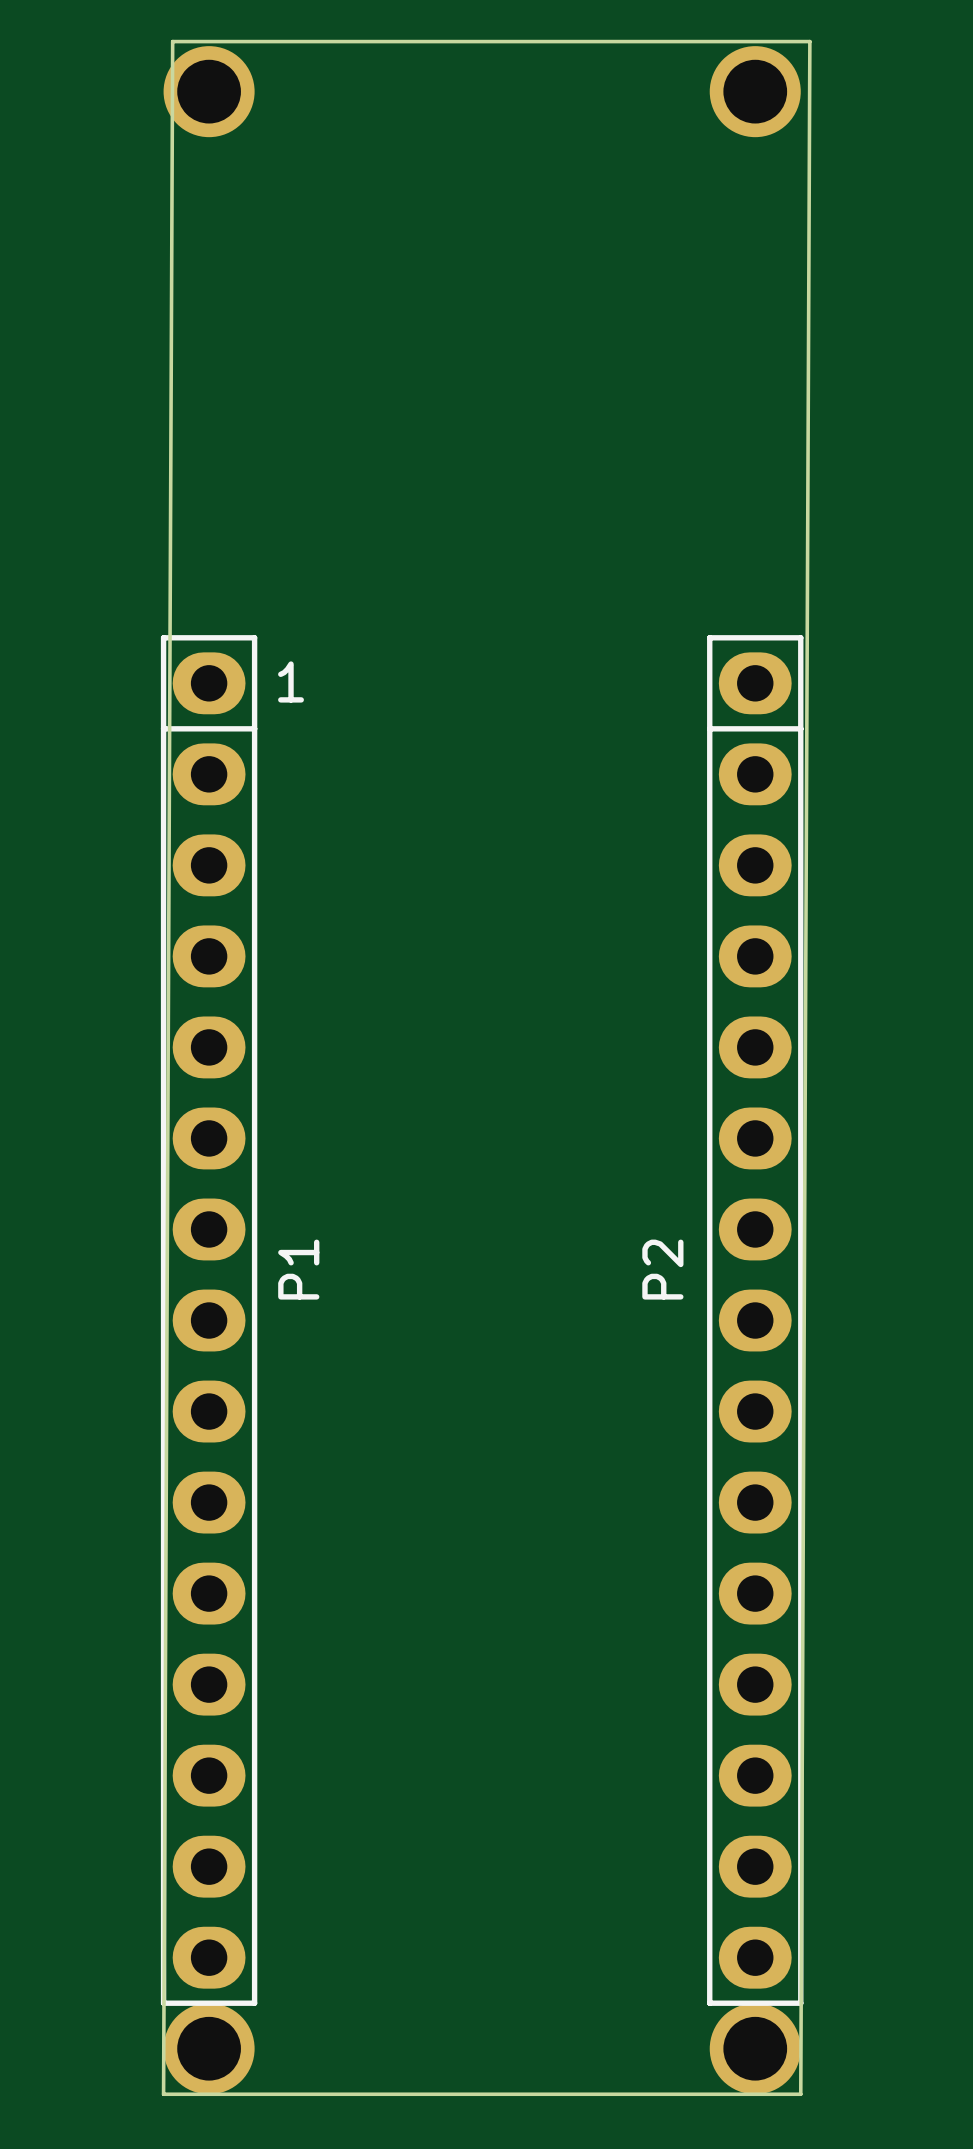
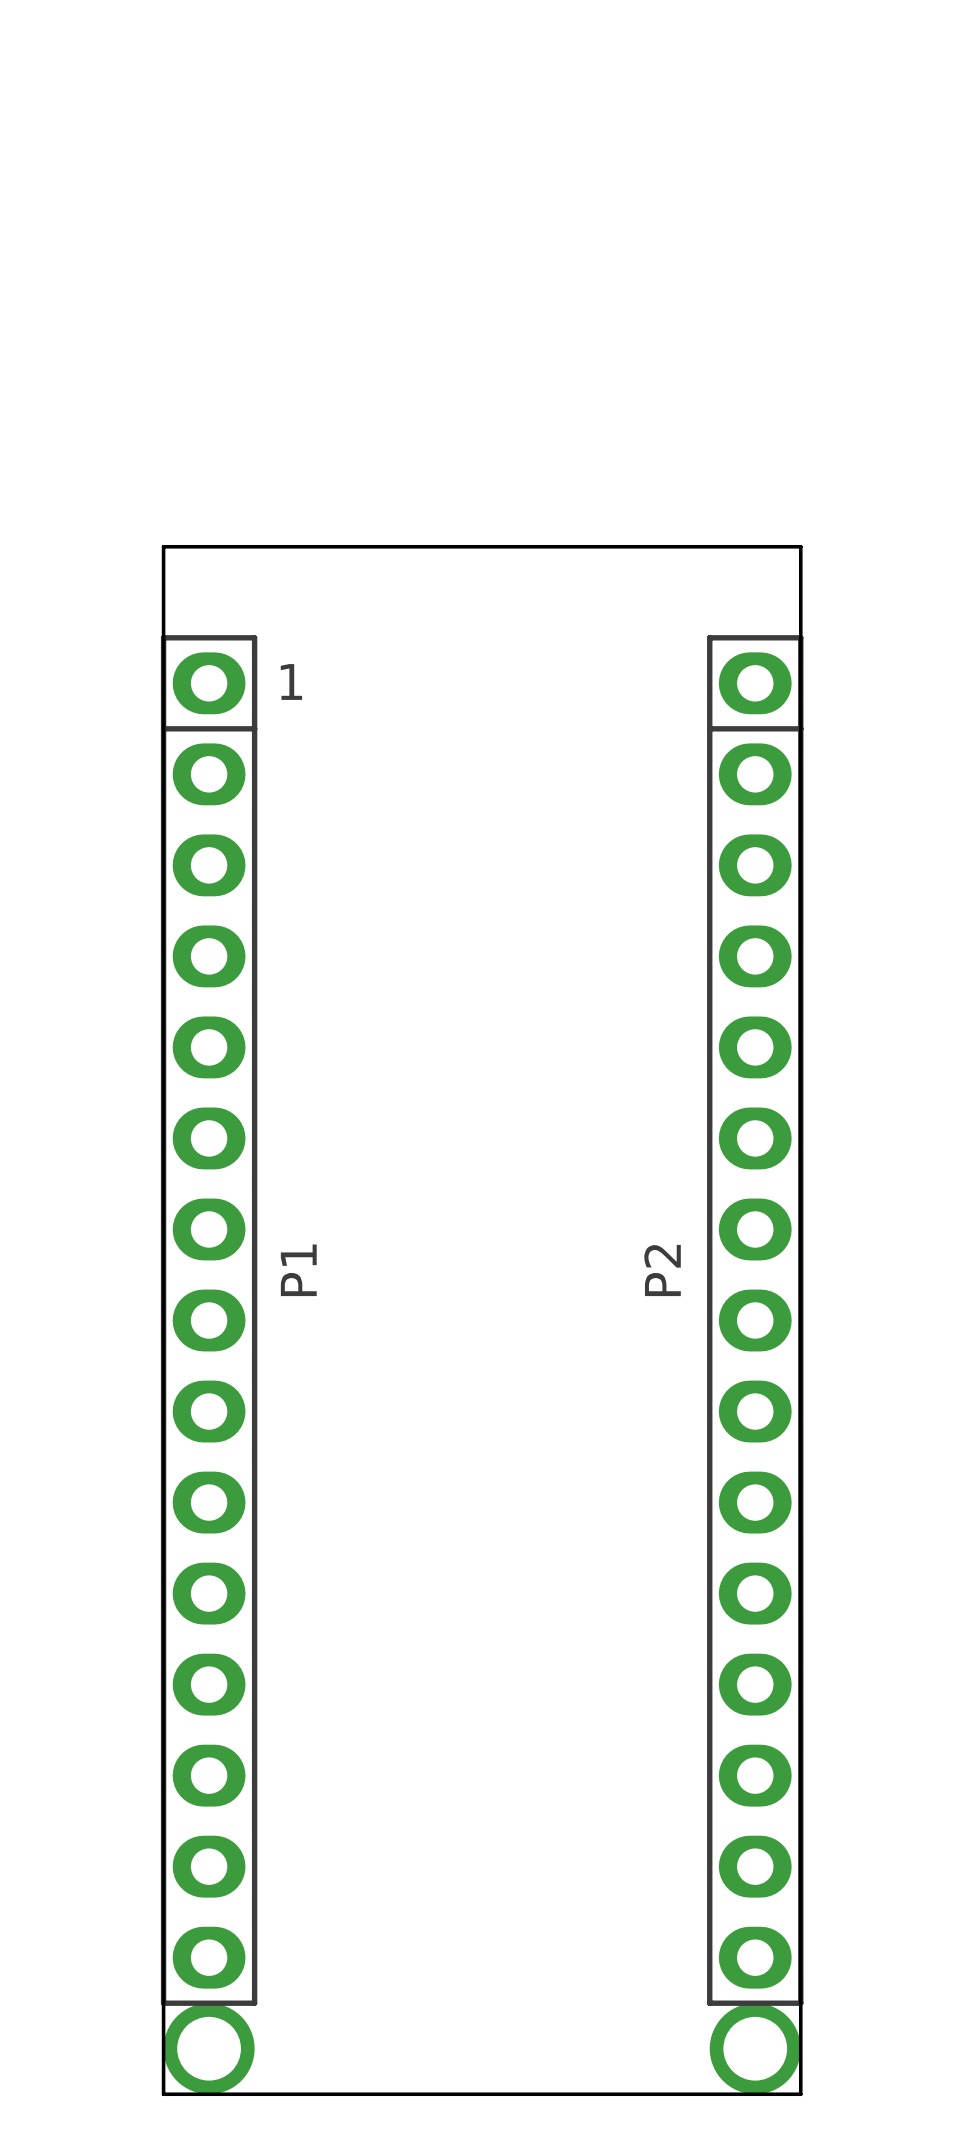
part: (209, 91) -> none
part: (755, 91) -> none
board edge: (163, 2094) (172, 41) (809, 41) (800, 2094) -> (163, 2094) (163, 546) (800, 546) (800, 2094)

